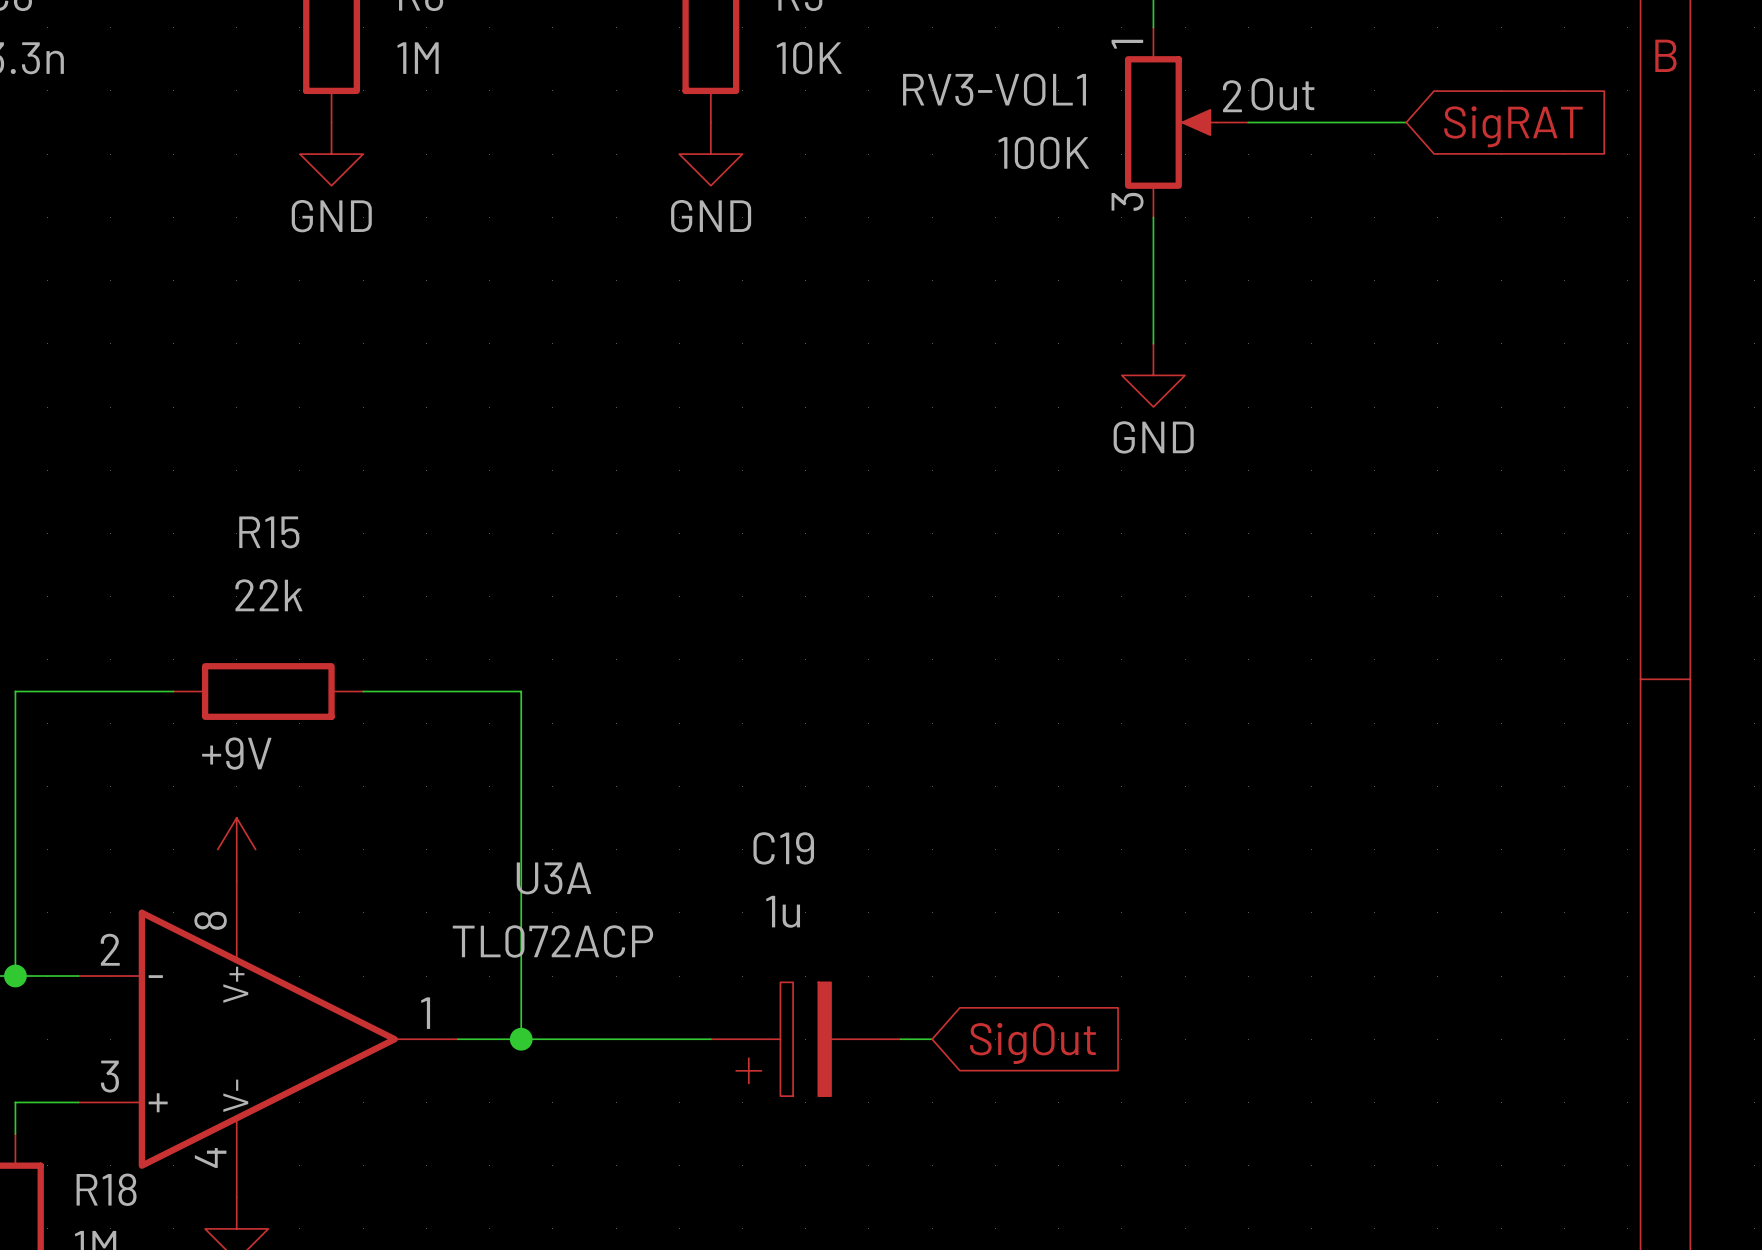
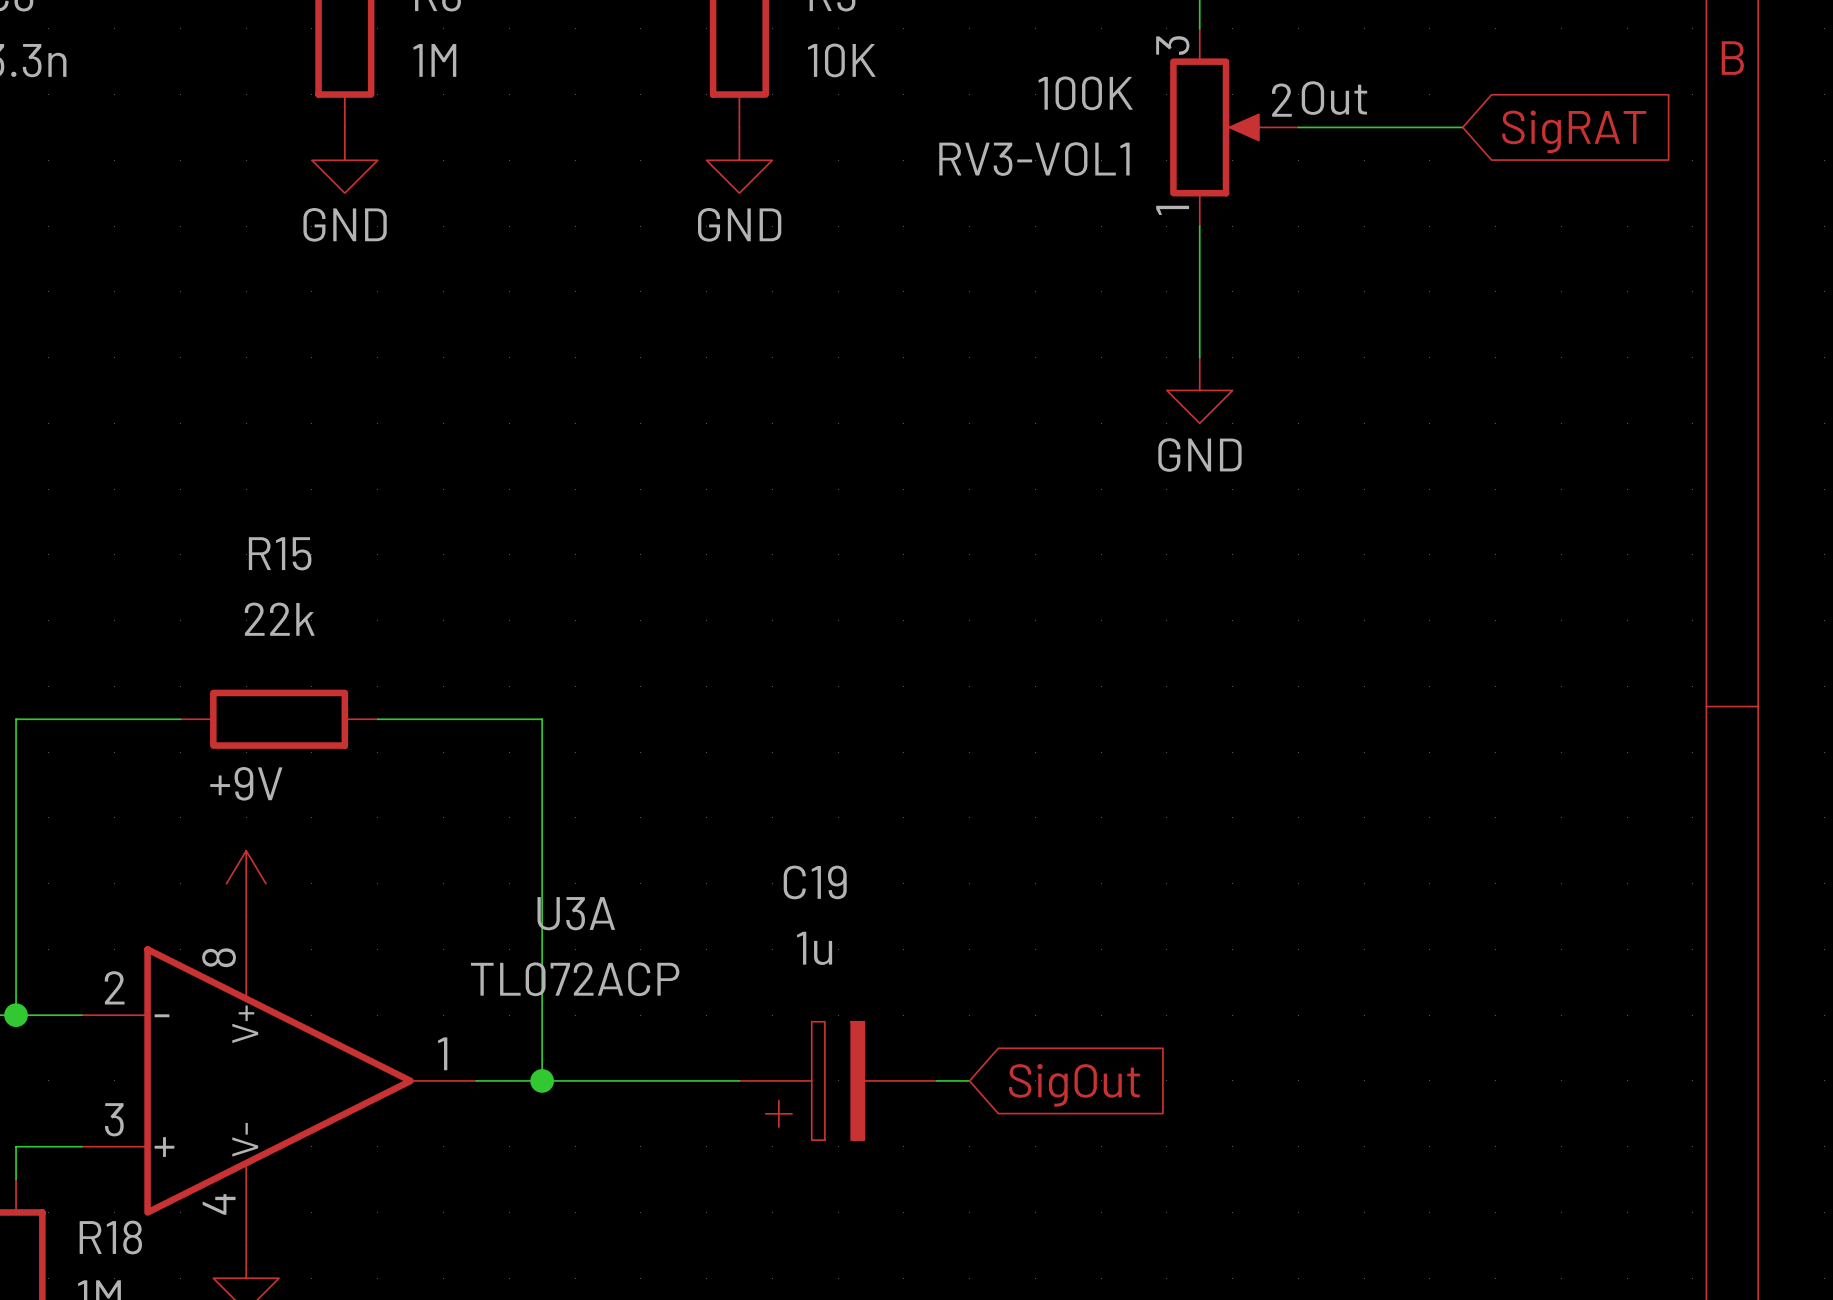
RV3-VOL1 flip: as is (1170, 122) -> up-down (1217, 127)

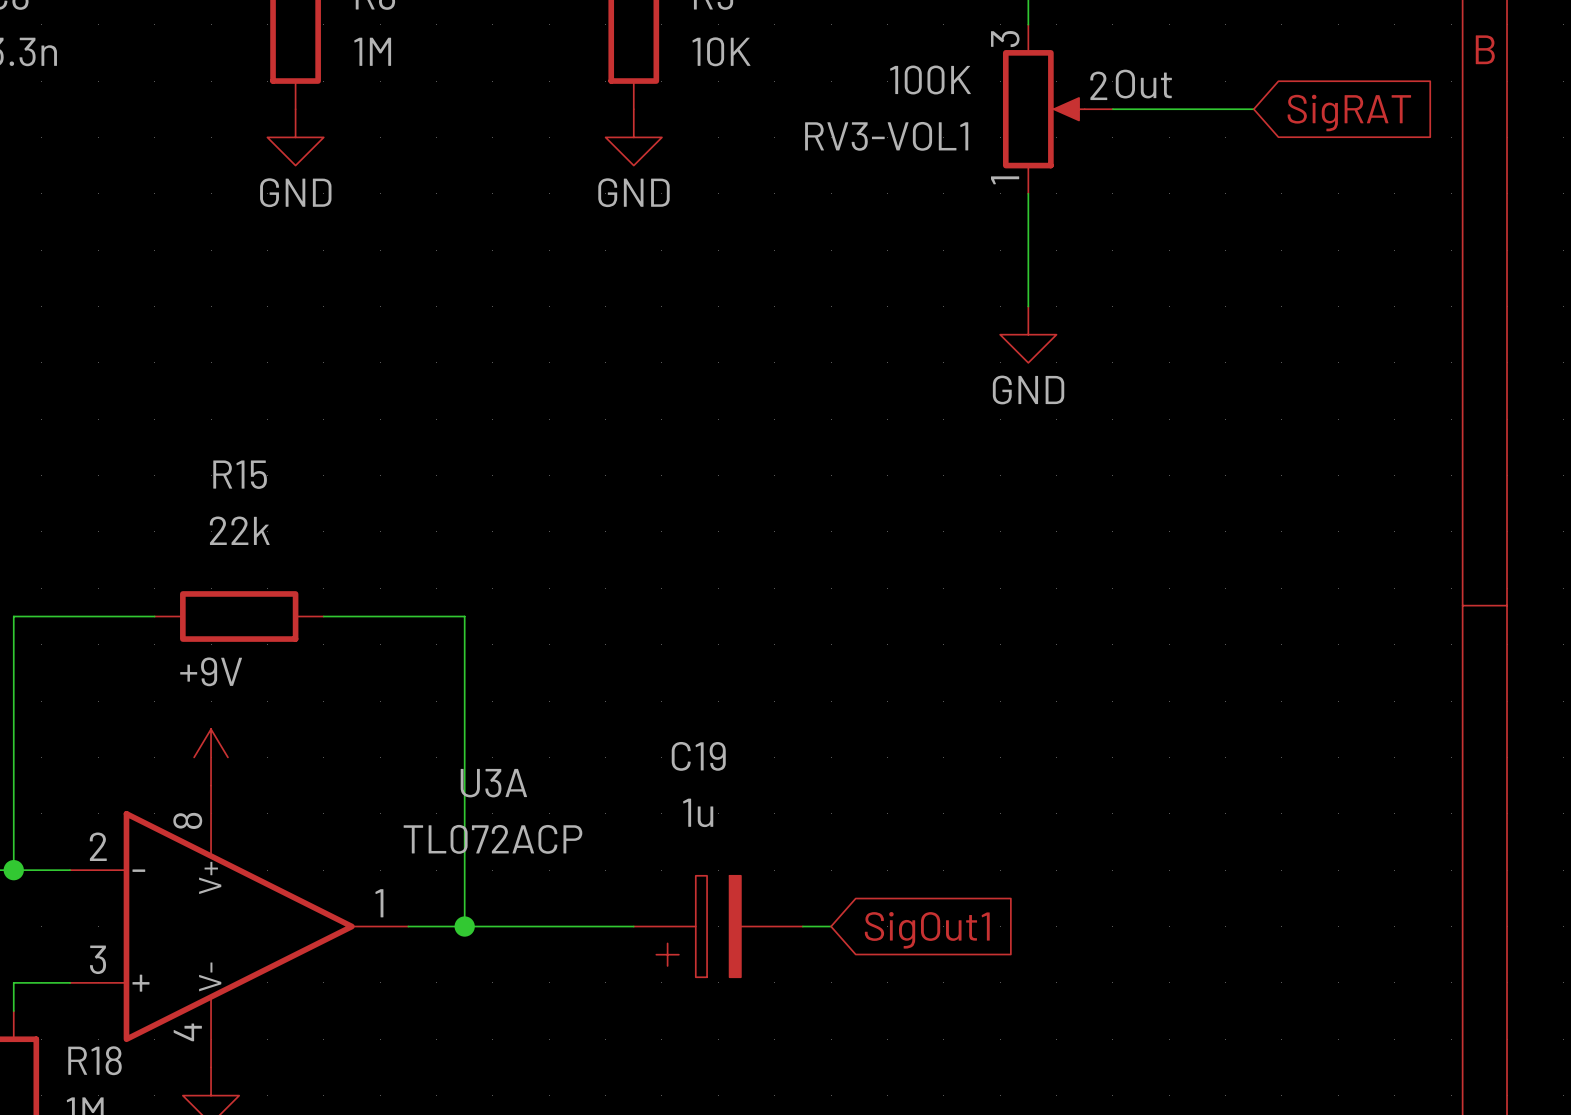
global label: SigOut (1074, 1085) -> SigOut1 (927, 930)

